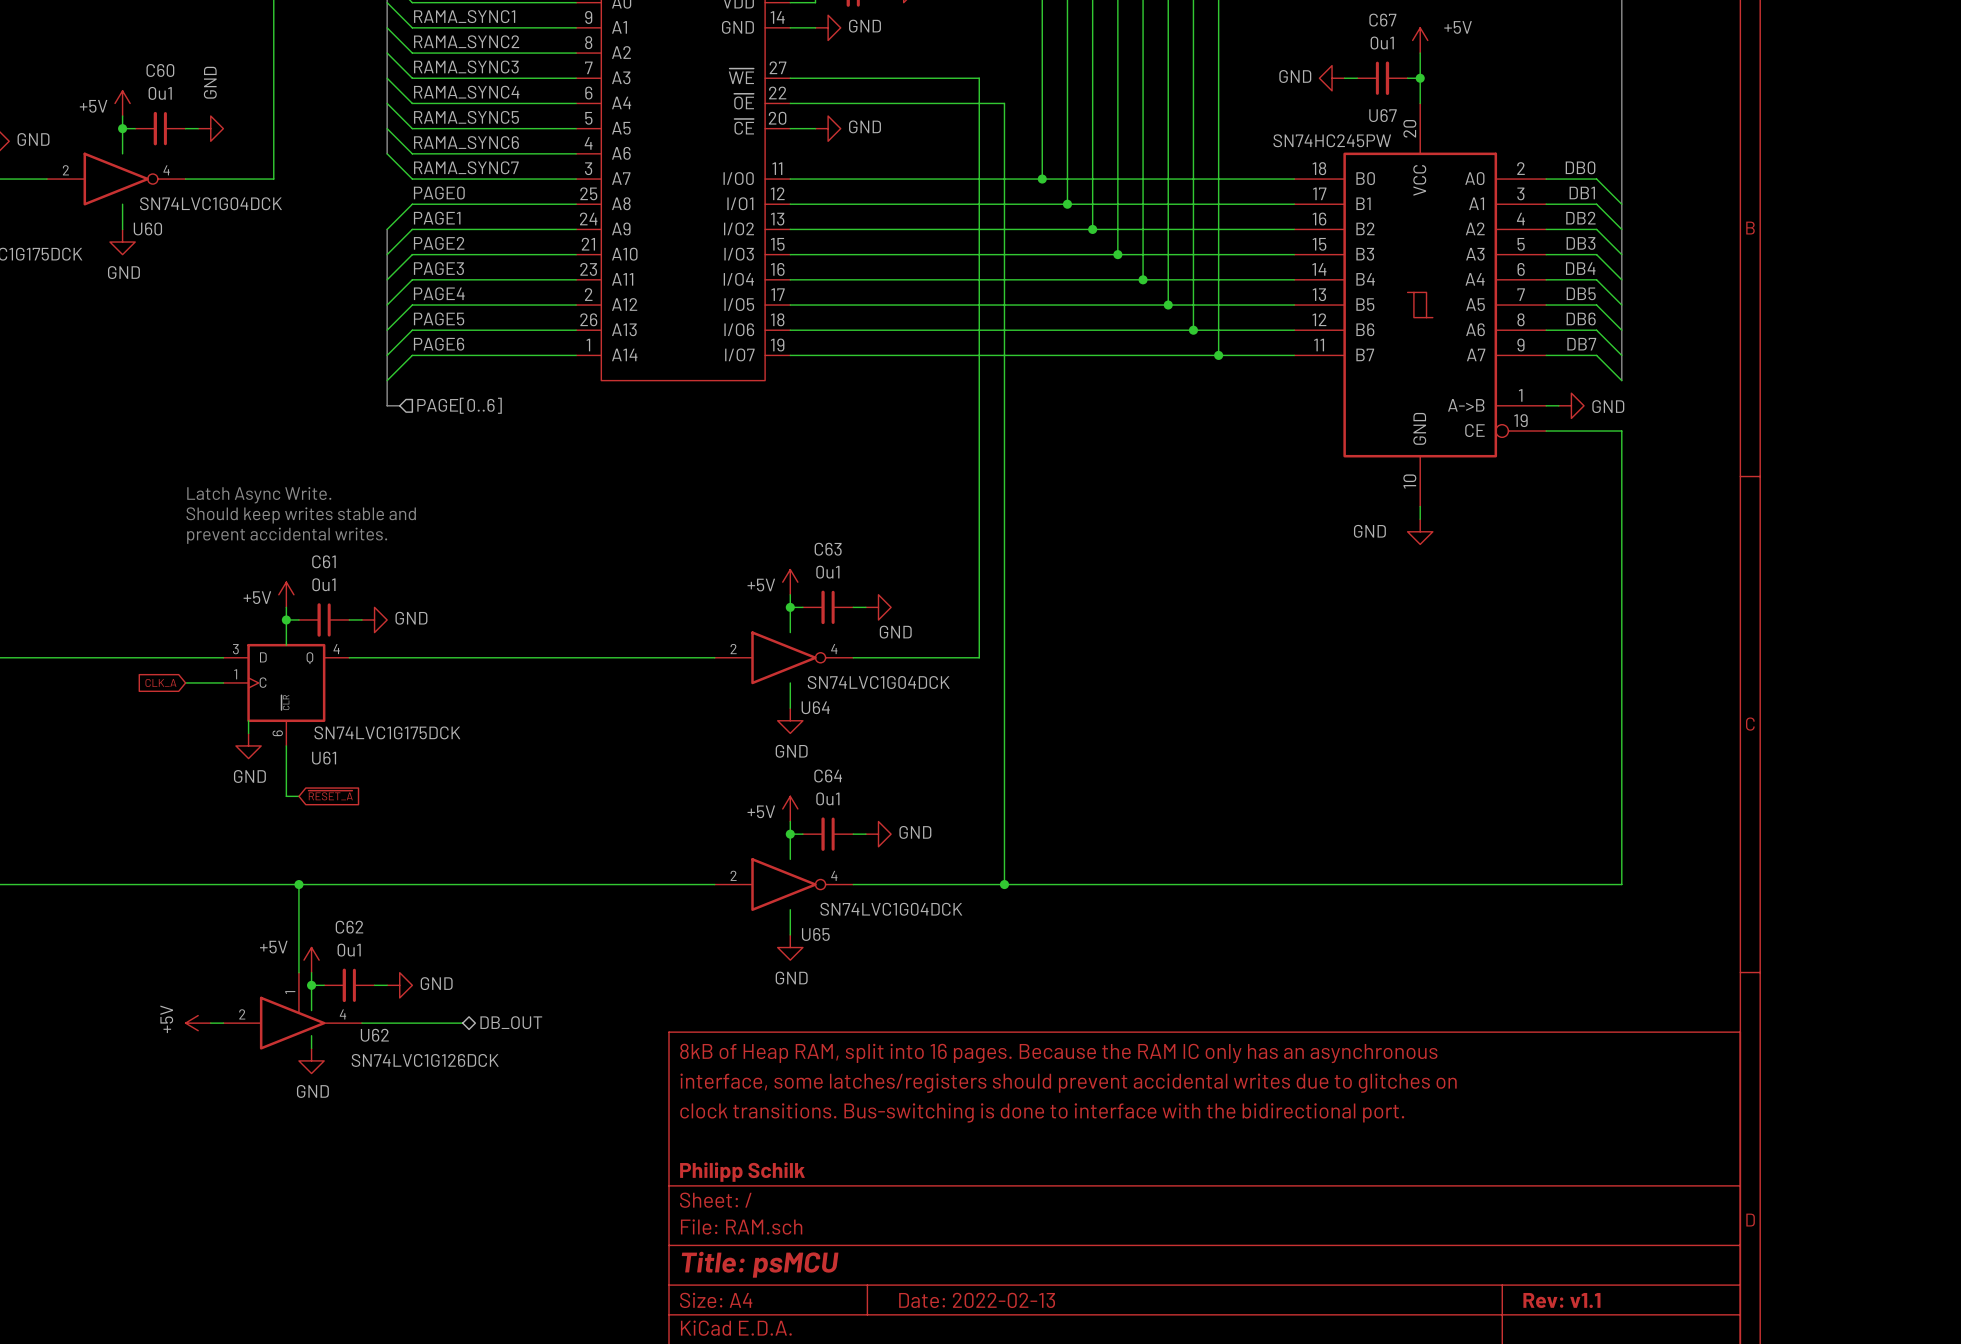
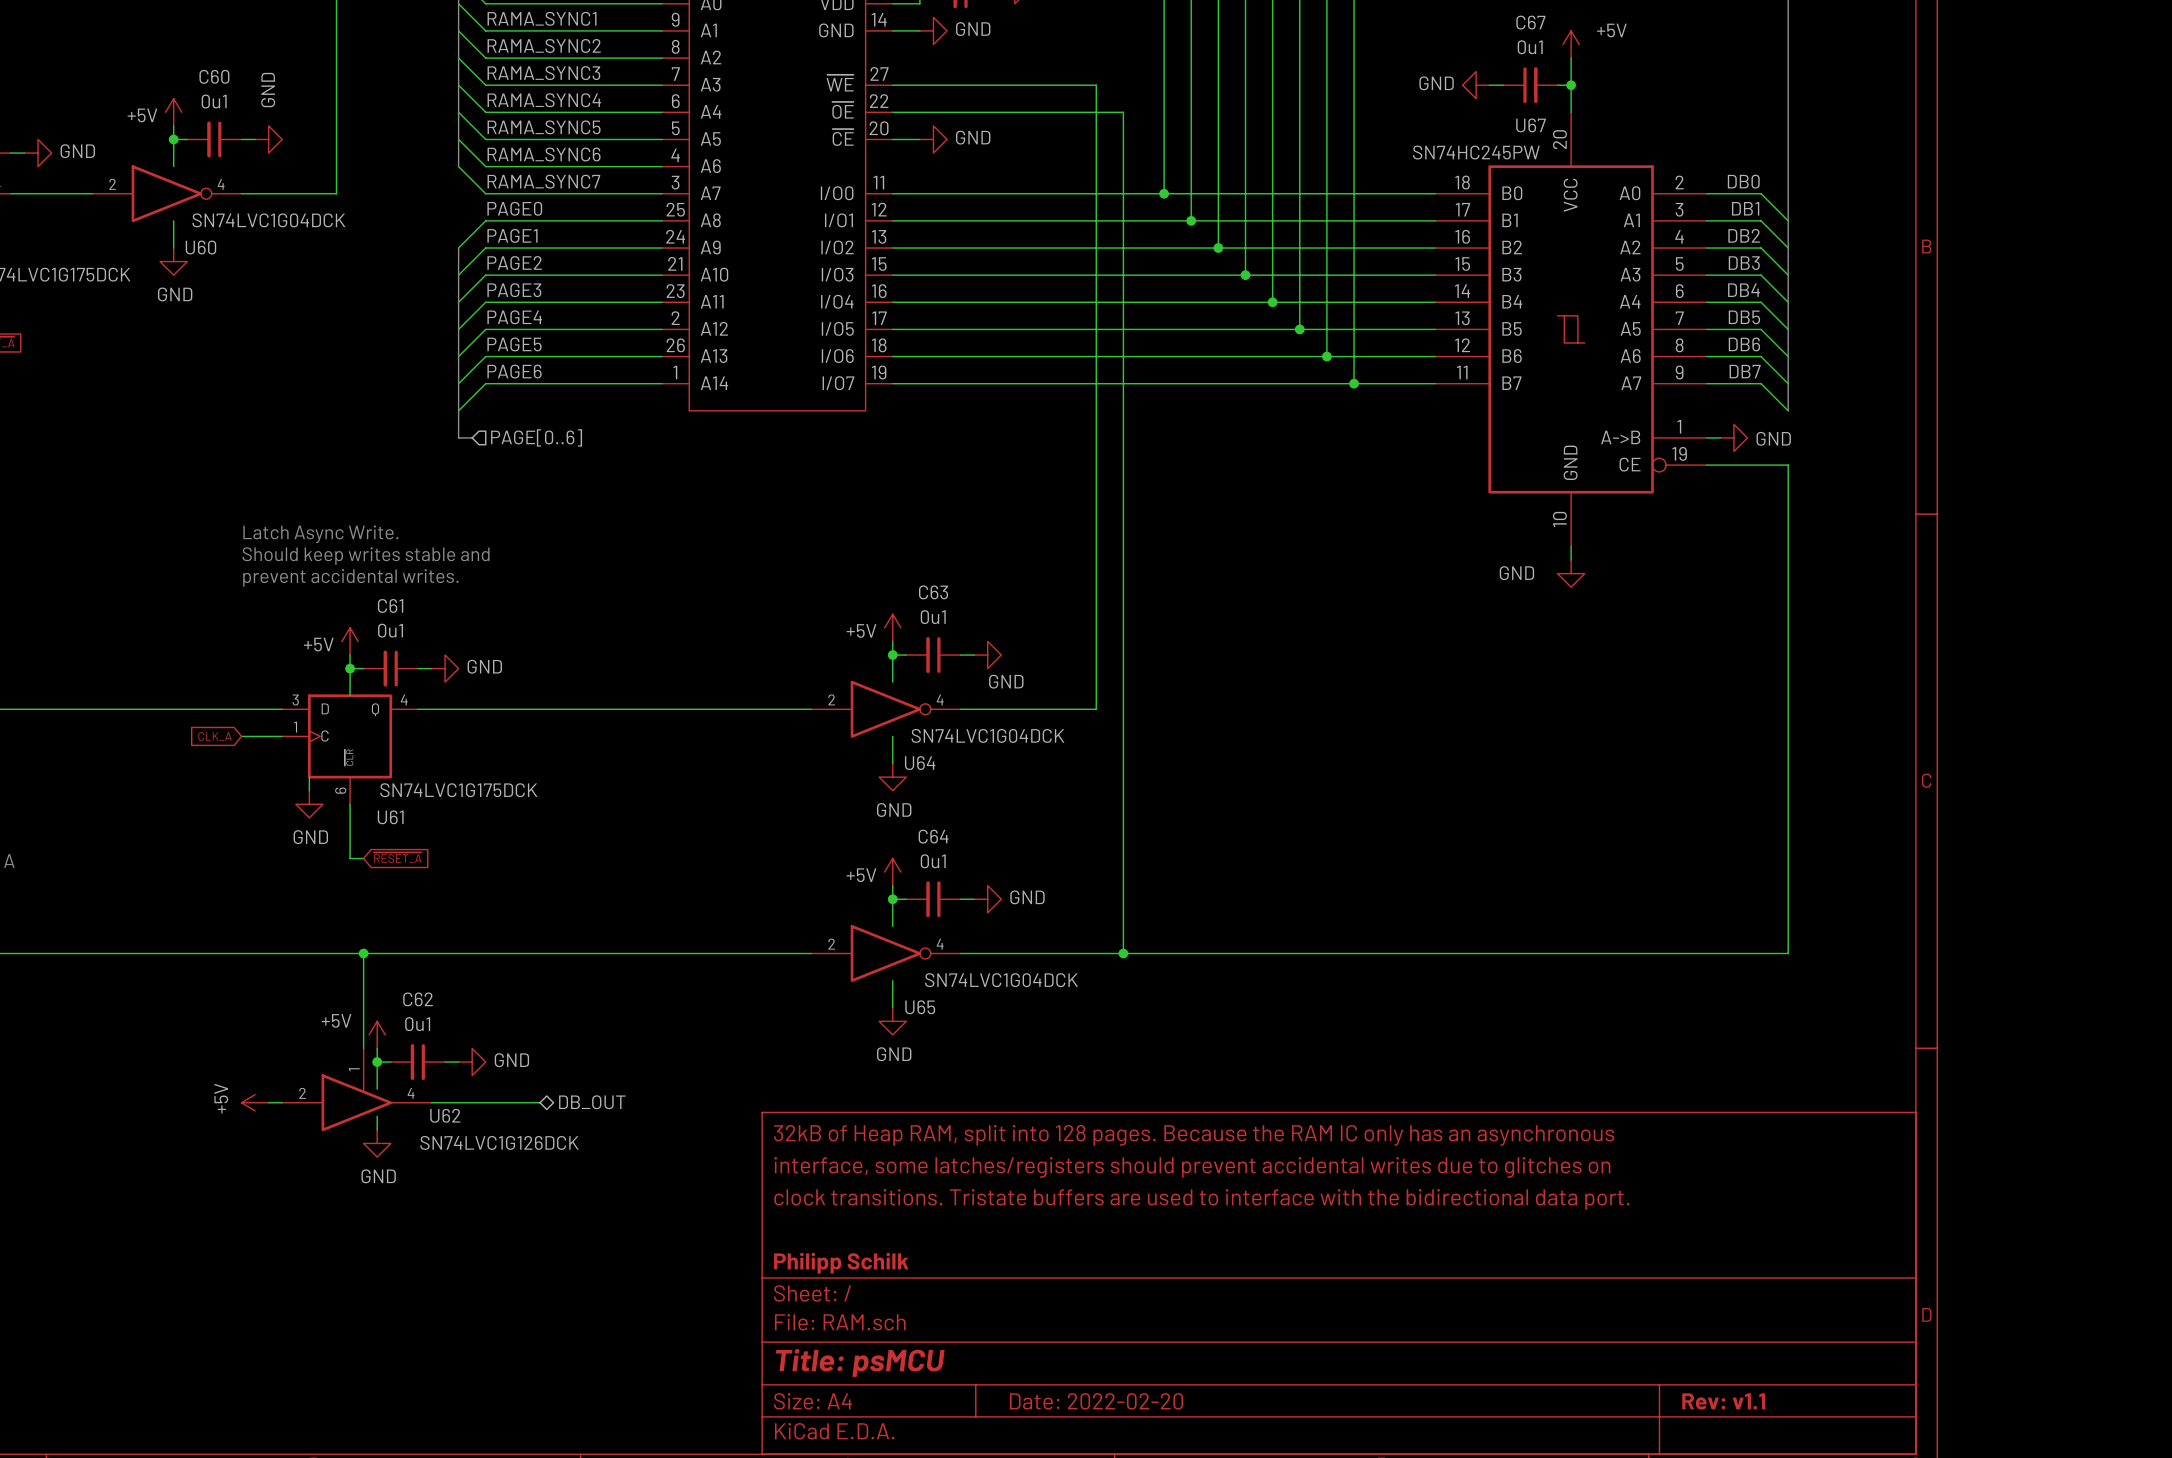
title block: 8kB of Heap RAM, split into 16 pages. Because the RAM IC only has an asynchronous (1058, 1053) -> 32kB of Heap RAM, split into 128 pages. Because the RAM IC only has an asynchronous (1194, 1135)
title block: clock transitions. Bus-switching is done to interface with the bidirectional port. (1042, 1112) -> clock transitions. Tristate buffers are used to interface with the bidirectional data port. (1201, 1199)
title block: Date: 2022-02-13 (977, 1300) -> Date: 2022-02-20 (1096, 1401)

